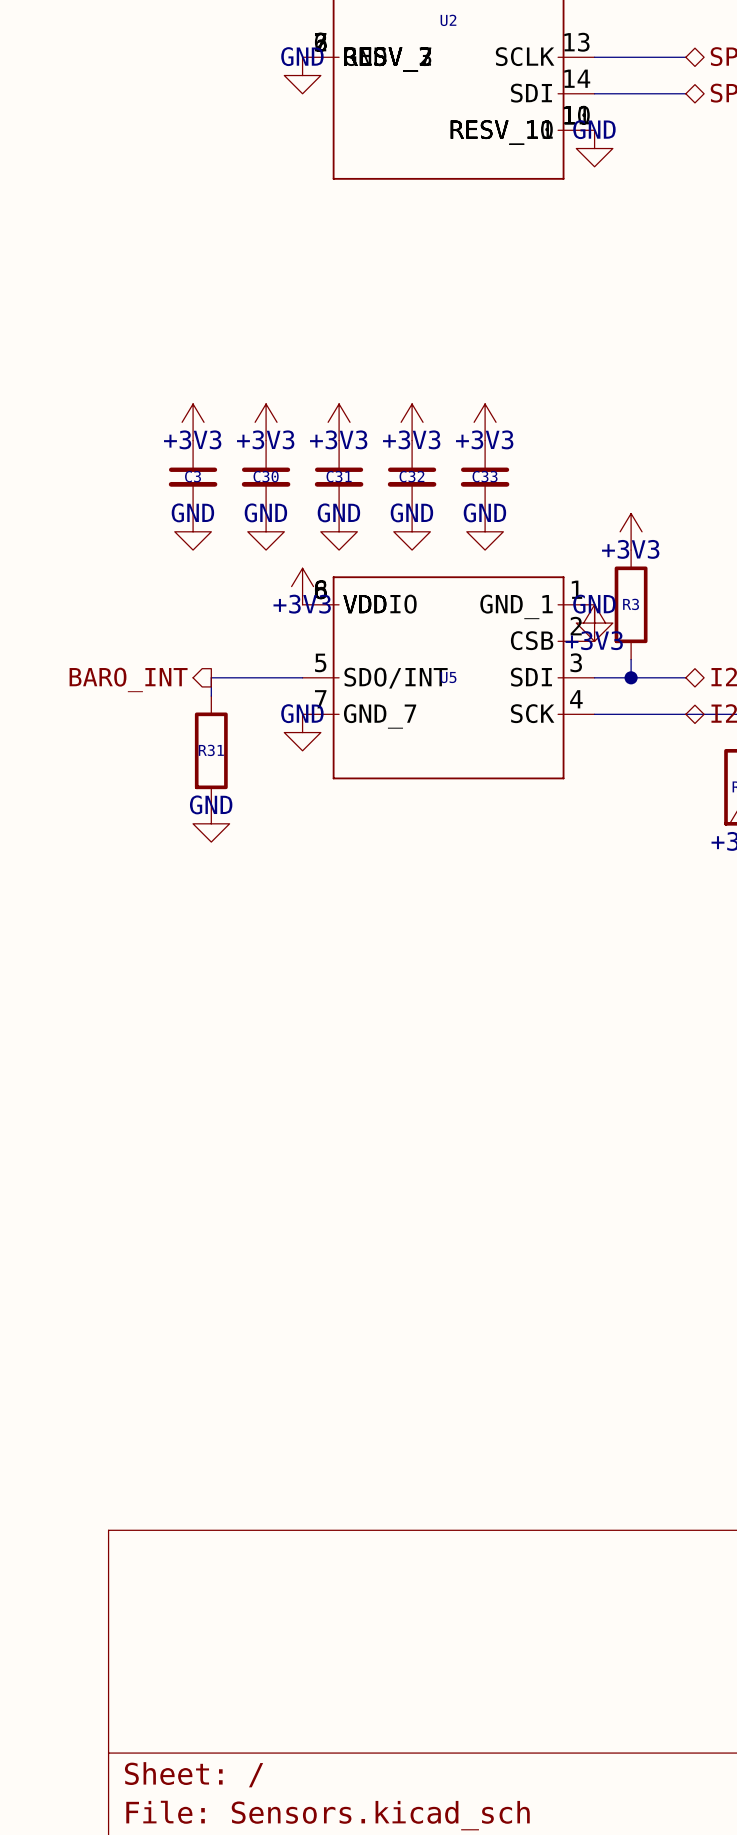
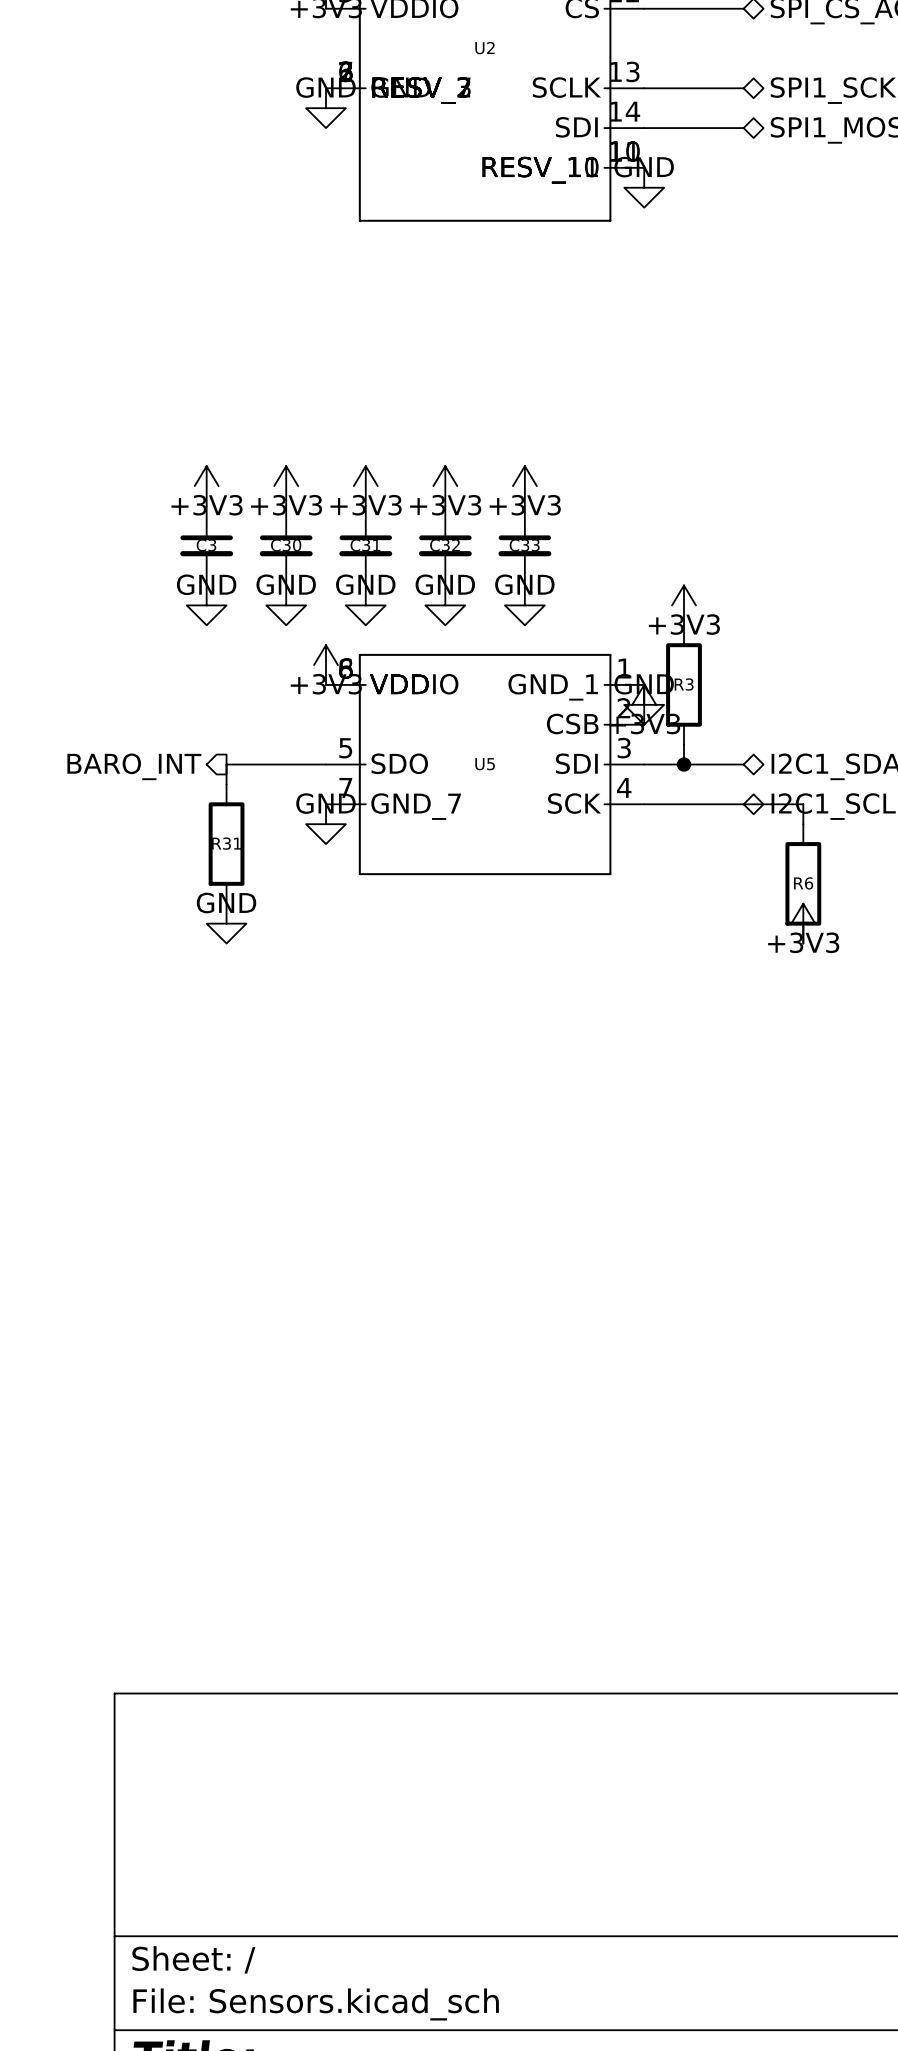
U5 pin name: SDO/INT (396, 678) -> SDO (399, 763)

